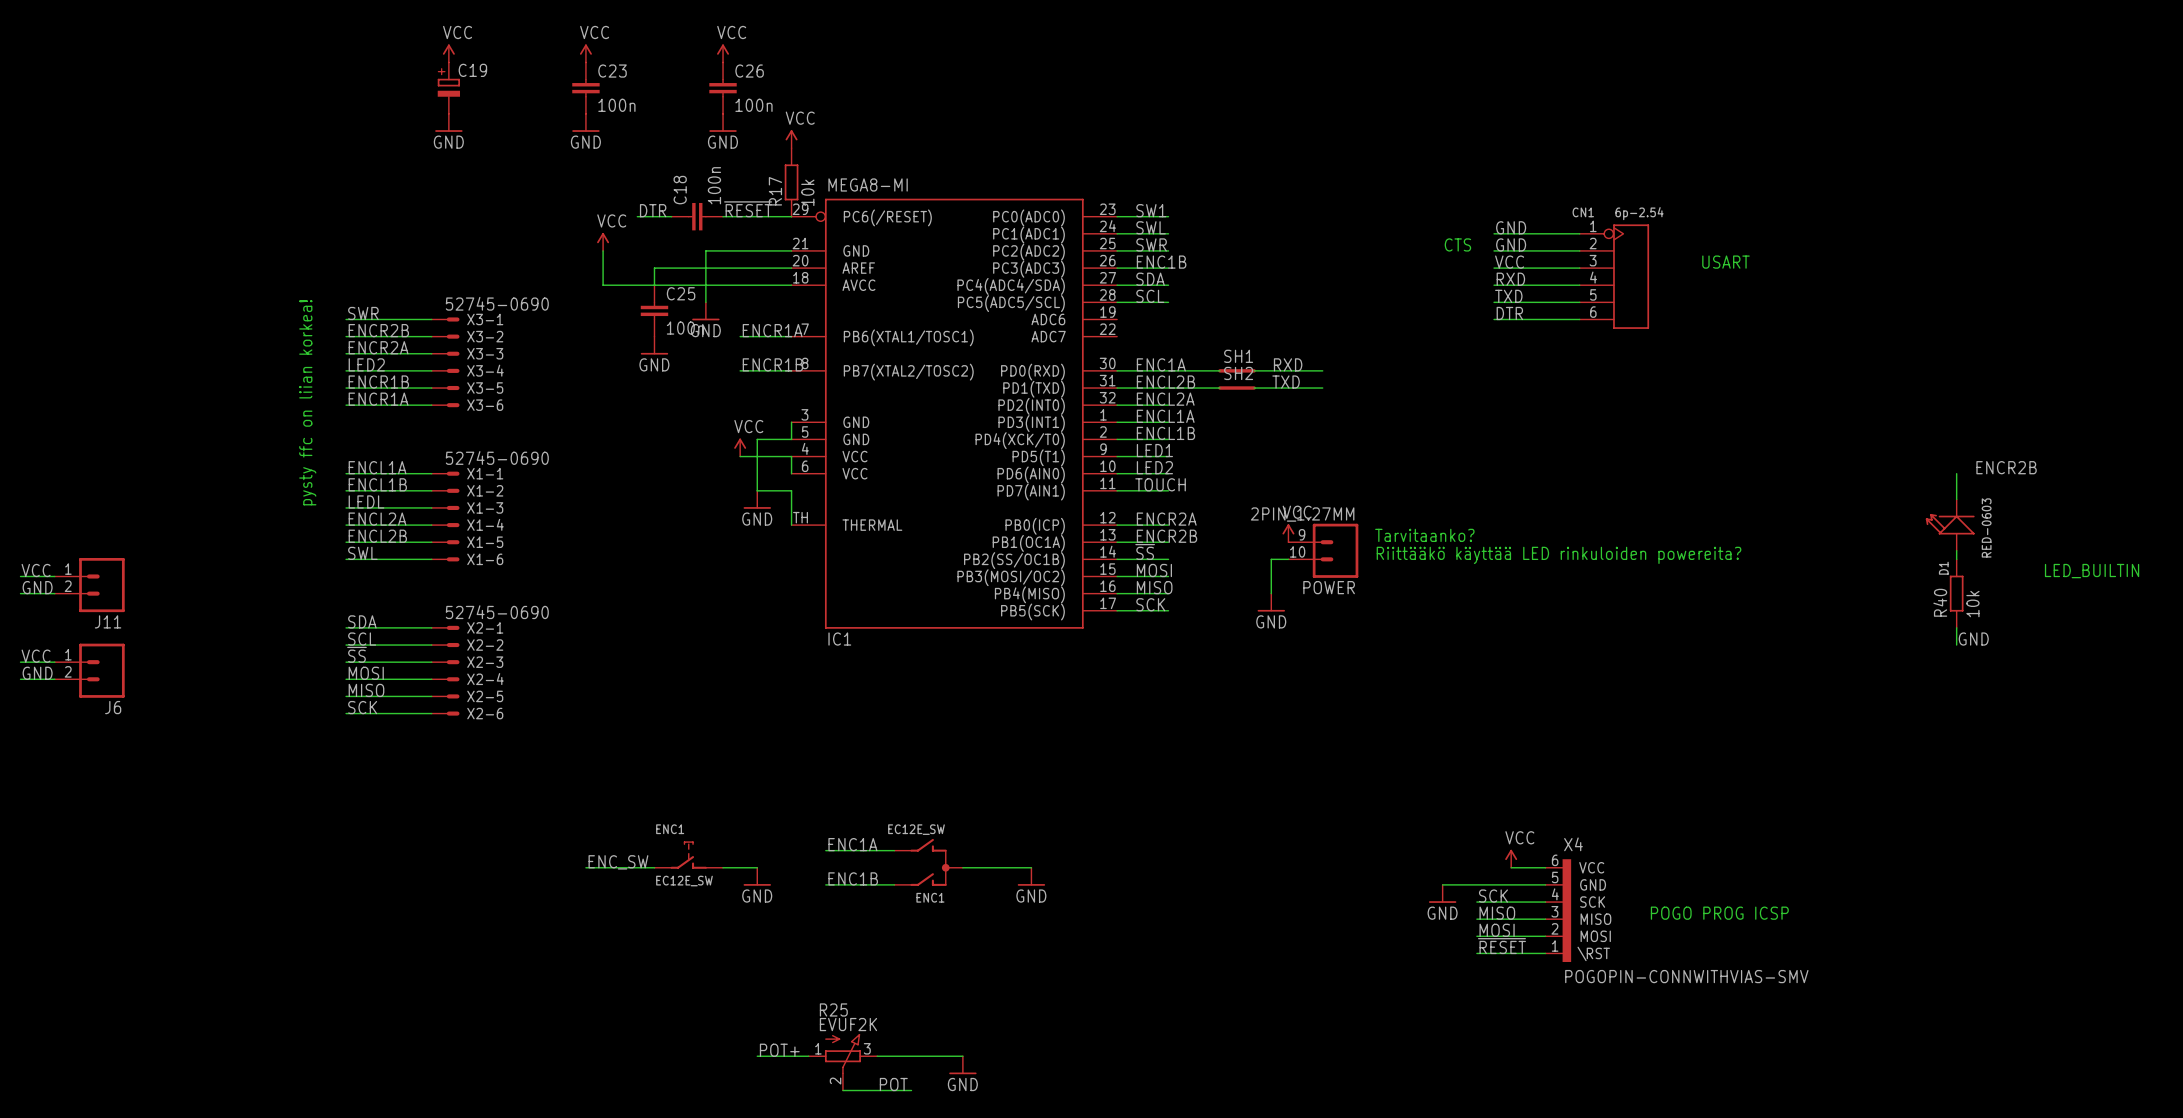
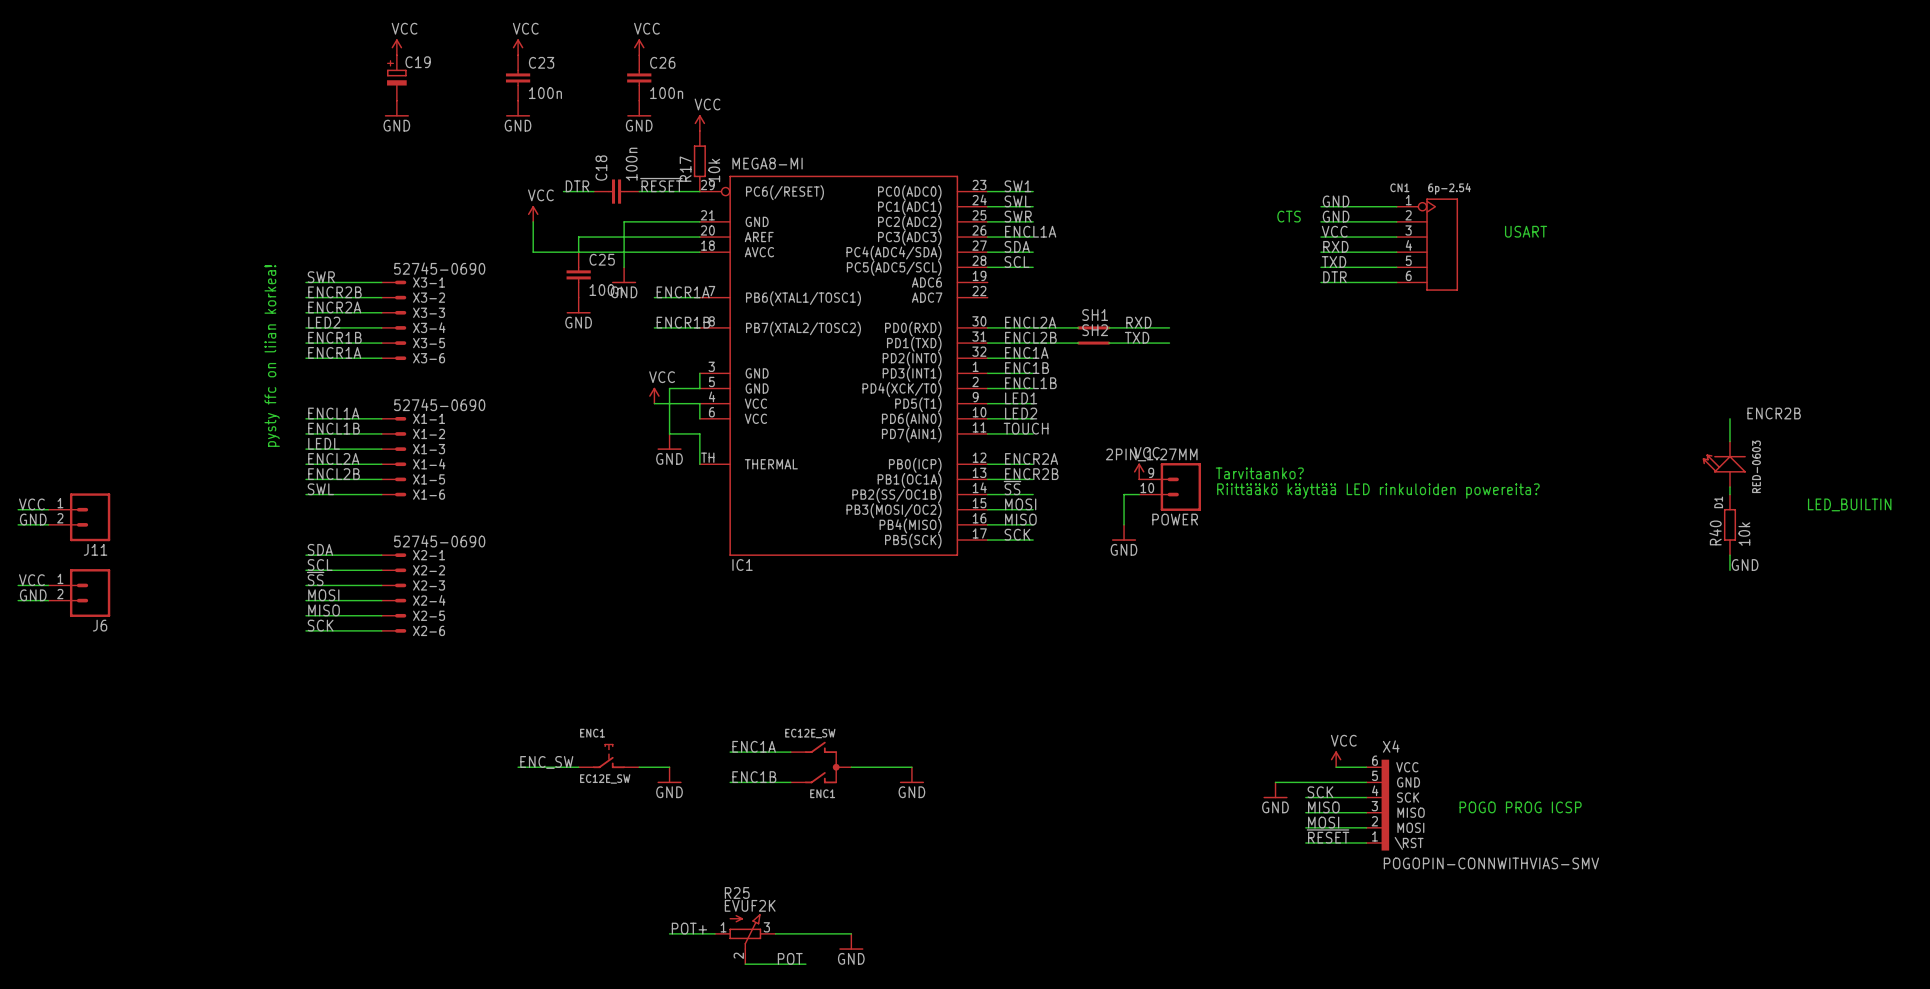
label: ENC1B (1161, 262) -> ENCL1A (1030, 231)
label: ENC1A (1161, 364) -> ENCL2A (1030, 322)
label: ENCL2A (1165, 399) -> ENC1A (1026, 352)
label: ENCL1A (1165, 416) -> ENC1B (1027, 368)

